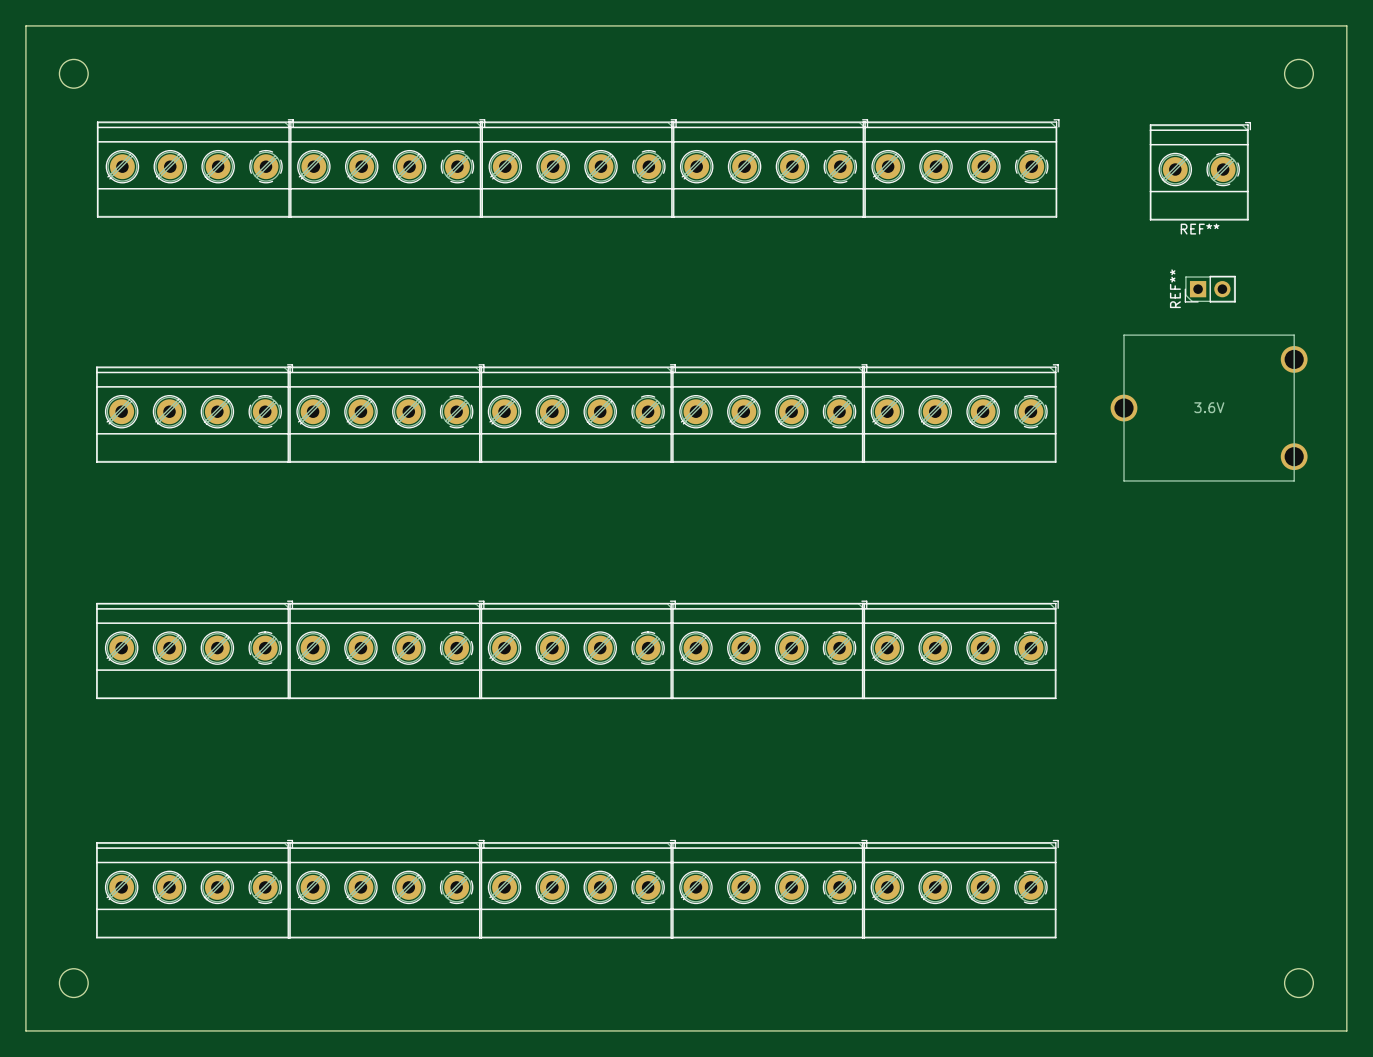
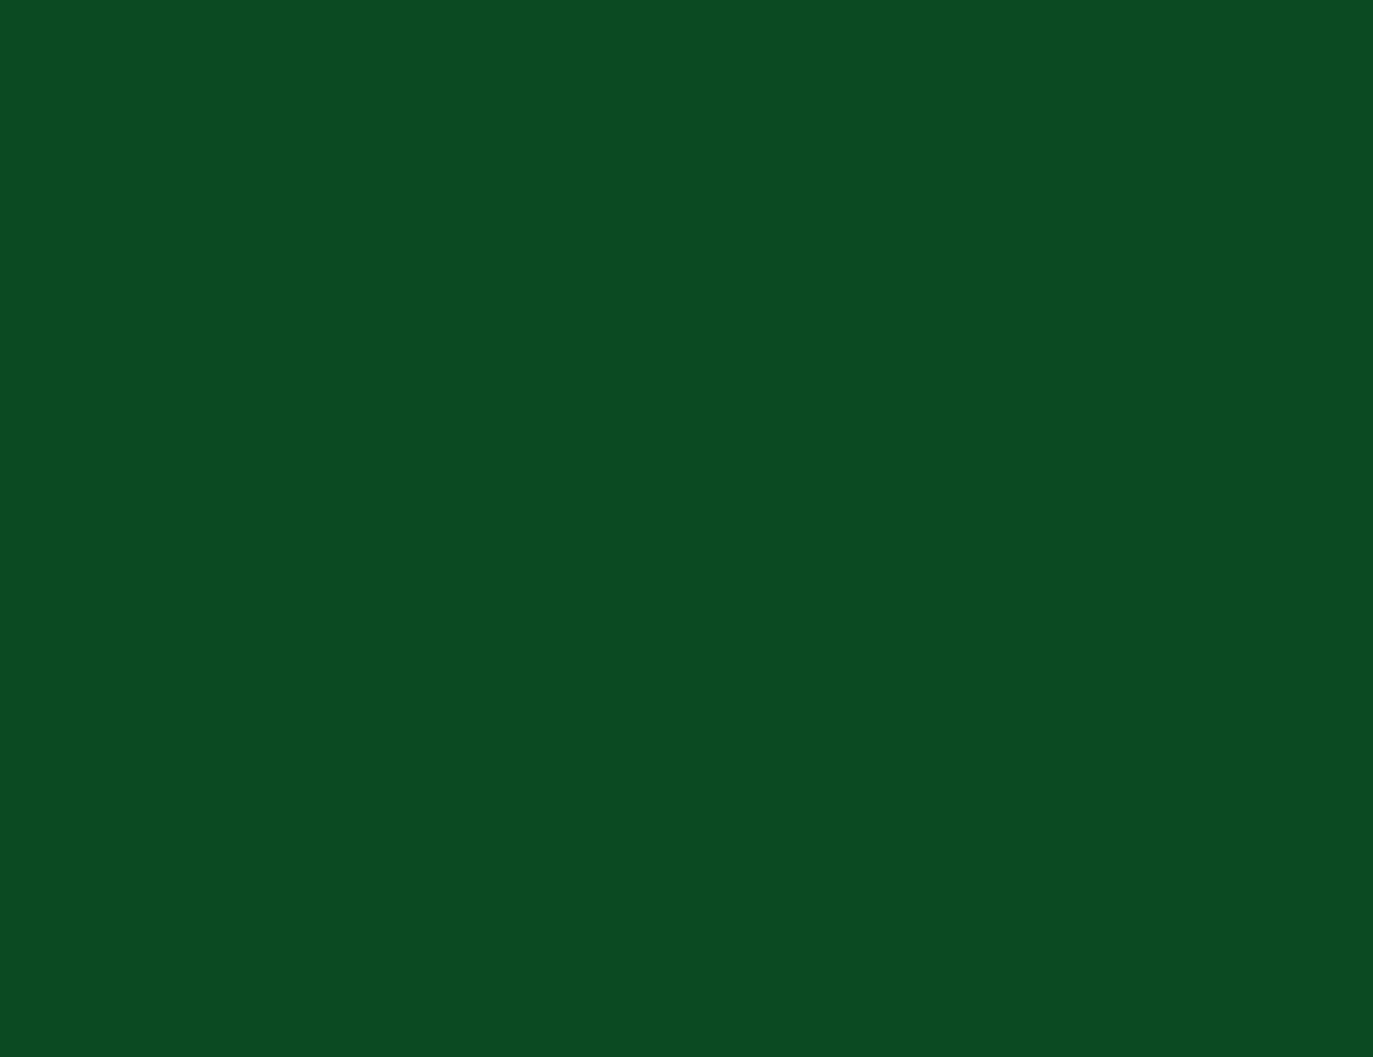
board edge: (25, 25) (1346, 25) (1346, 1030) (25, 1030) (25, 25) -> none
round board edge: [58, 58, 89, 89] -> none
round board edge: [1284, 58, 1314, 89] -> none
part: (195, 168) -> none
part: (386, 168) -> none
part: (578, 168) -> none
part: (769, 168) -> none
part: (961, 168) -> none
REF**: (1200, 171) -> none
REF**: (1210, 289) -> none
part: 3.6V (1209, 408) -> none
part: (194, 413) -> none
part: (386, 413) -> none
part: (577, 413) -> none
part: (768, 413) -> none
part: (960, 413) -> none
part: (194, 649) -> none
part: (386, 649) -> none
part: (577, 649) -> none
part: (768, 649) -> none
part: (960, 649) -> none
part: (194, 889) -> none
part: (386, 889) -> none
part: (577, 889) -> none
part: (768, 889) -> none
part: (960, 889) -> none
round board edge: [58, 968, 89, 998] -> none
round board edge: [1284, 968, 1314, 998] -> none

